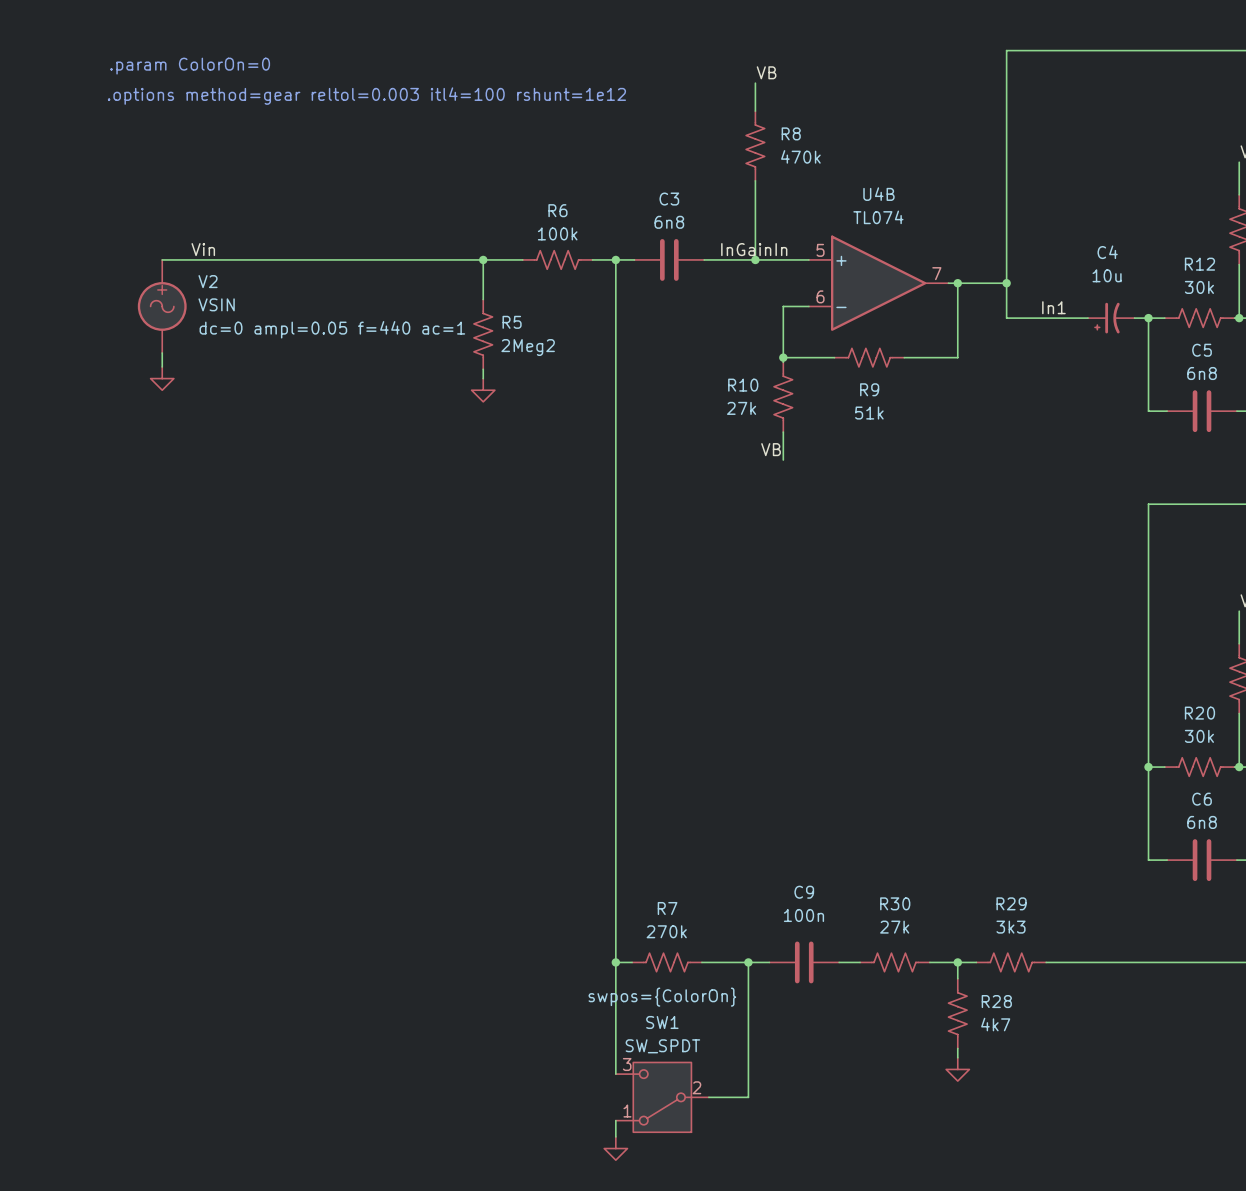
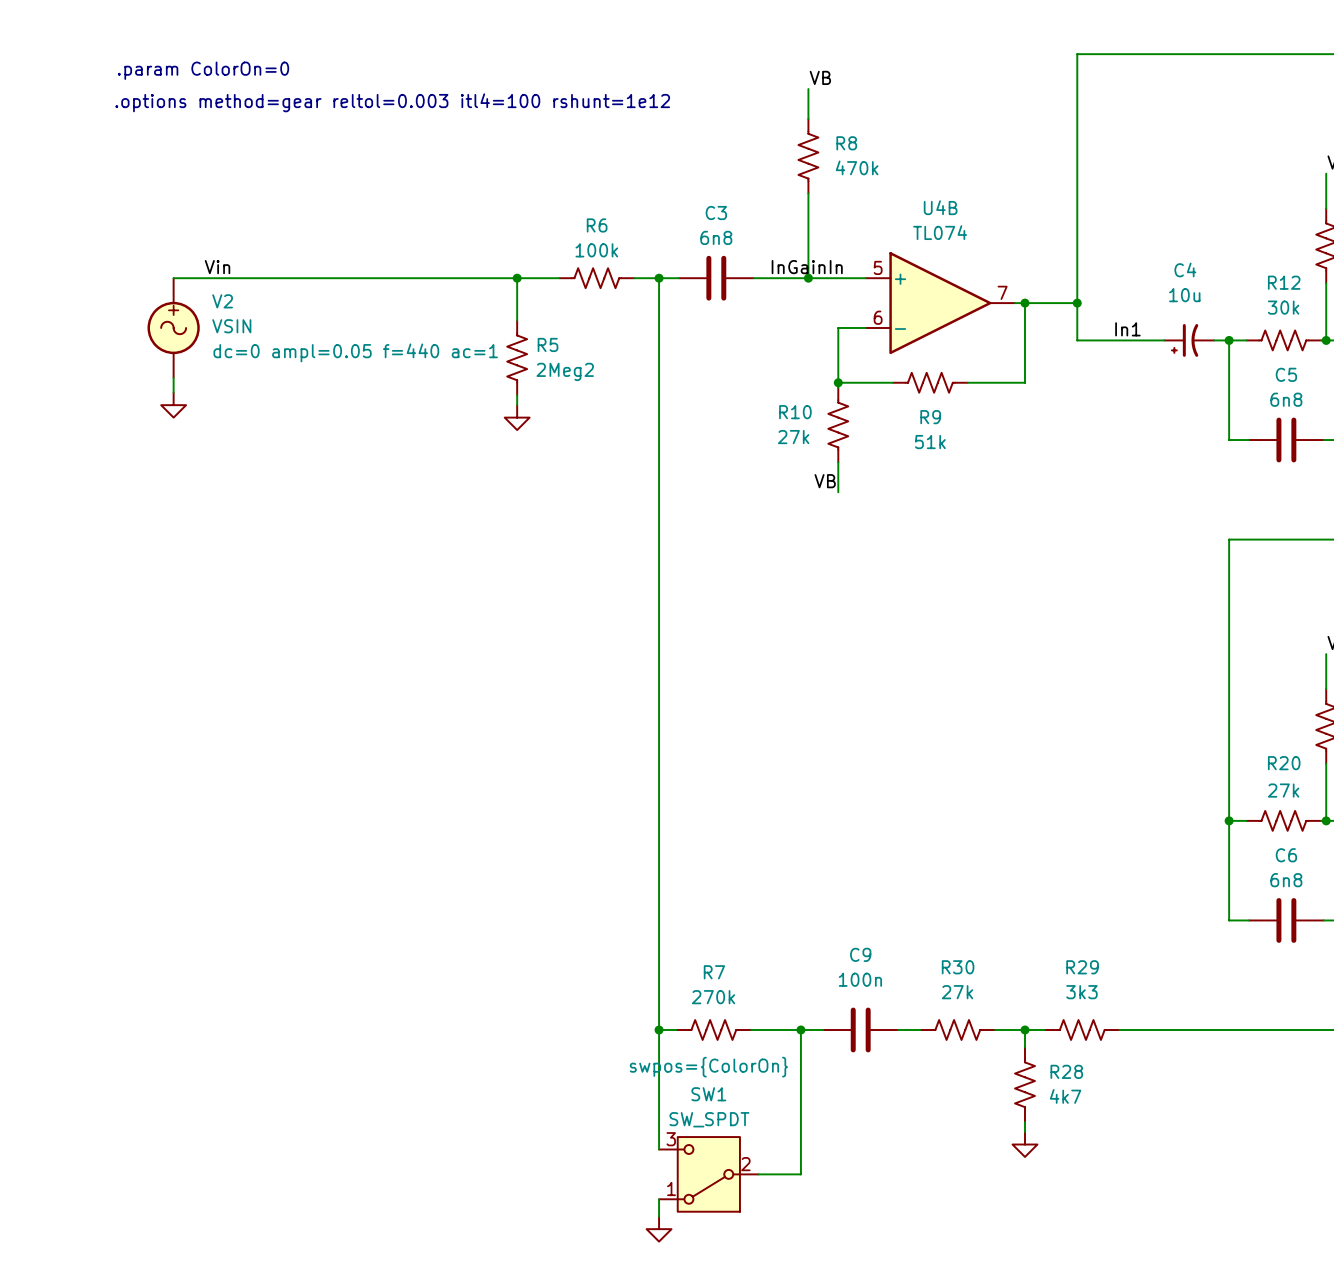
R20 value: 30k (1199, 736) -> 27k (1283, 790)

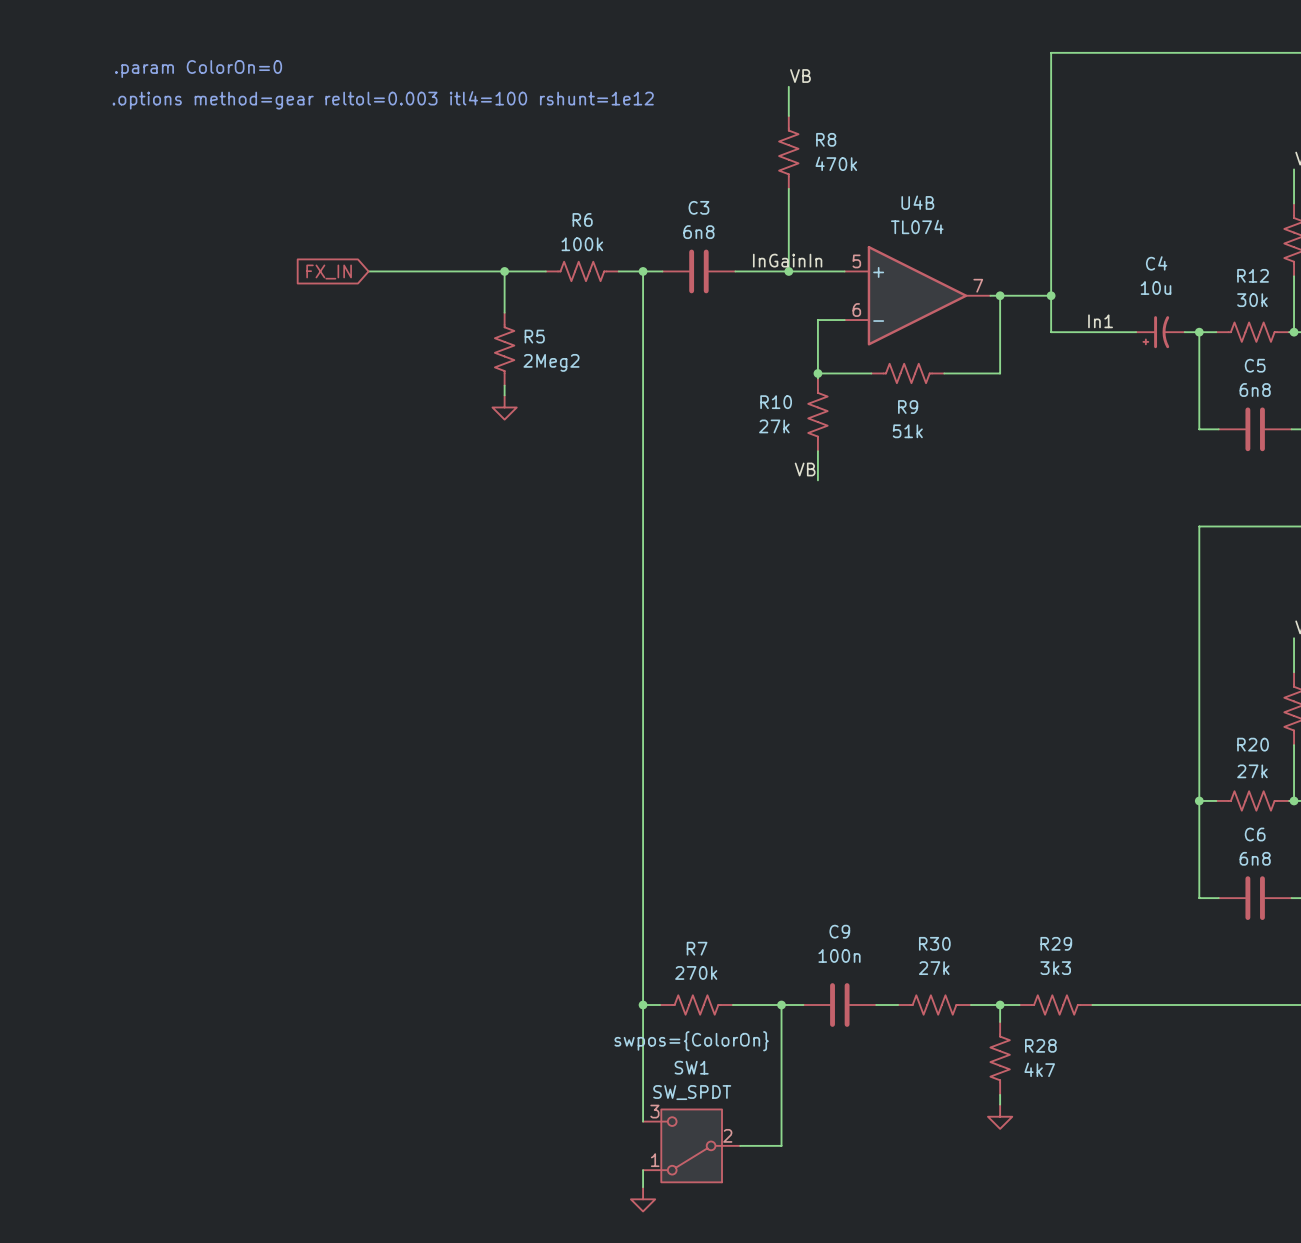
label: Vin (217, 267) -> none
wire: (173, 278) (377, 278) -> none
global label: none -> FX_IN (329, 272)
V2: VSIN (173, 327) -> none
wire: (173, 377) (173, 392) -> none
power symbol: (173, 405) -> none

